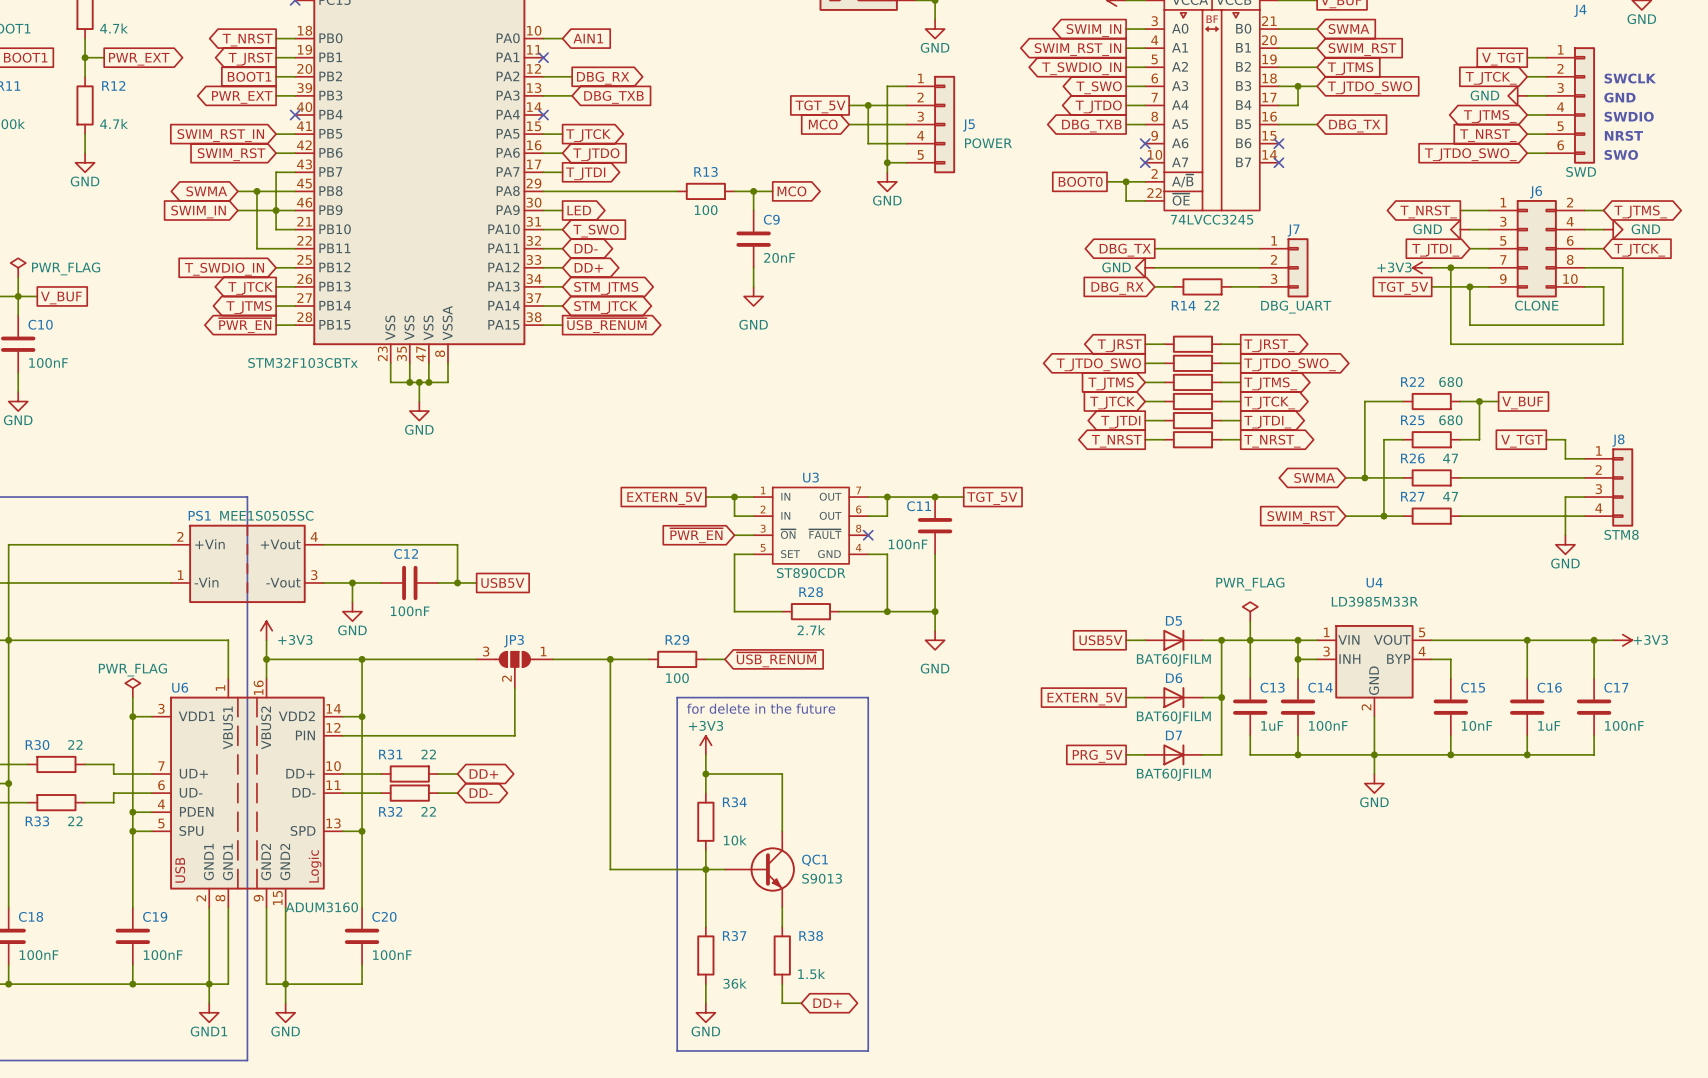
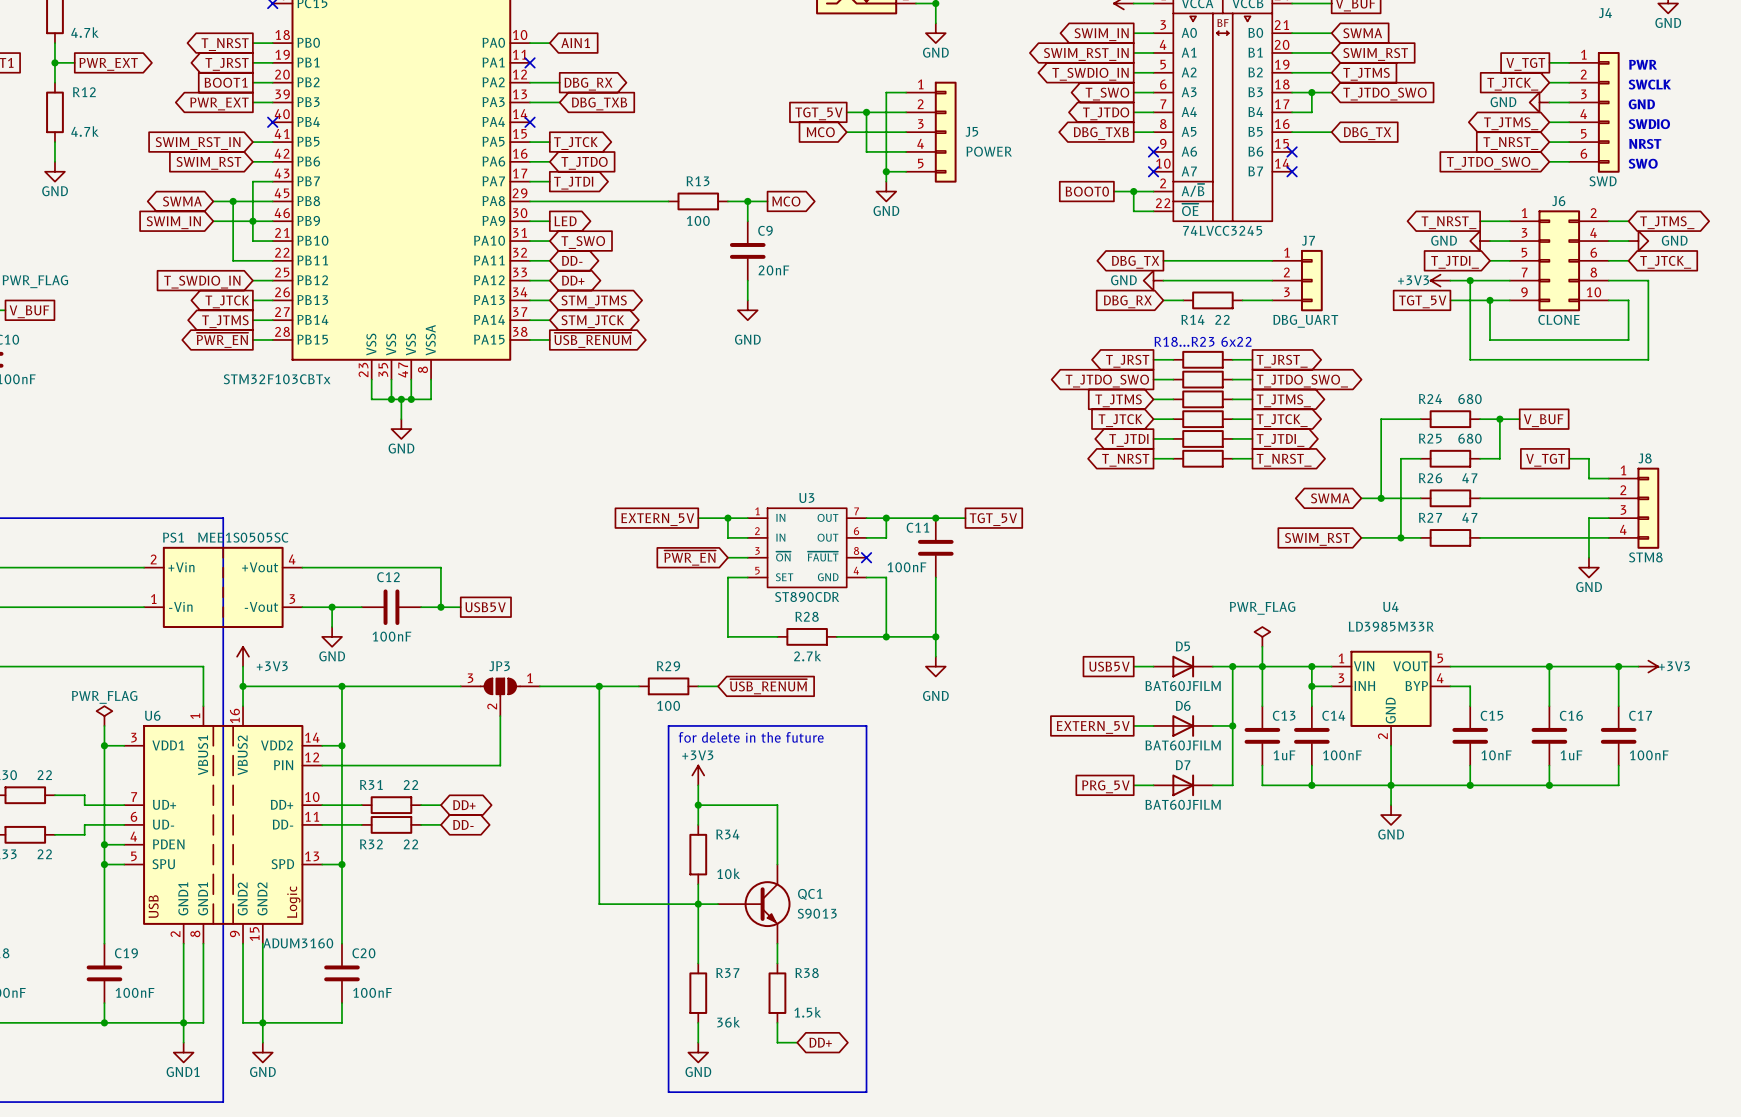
text: none -> PWR (1643, 64)
text: none -> R18...R23 6x22 (1203, 341)
R22 name: R22 (1412, 381) -> R24 (1430, 399)

